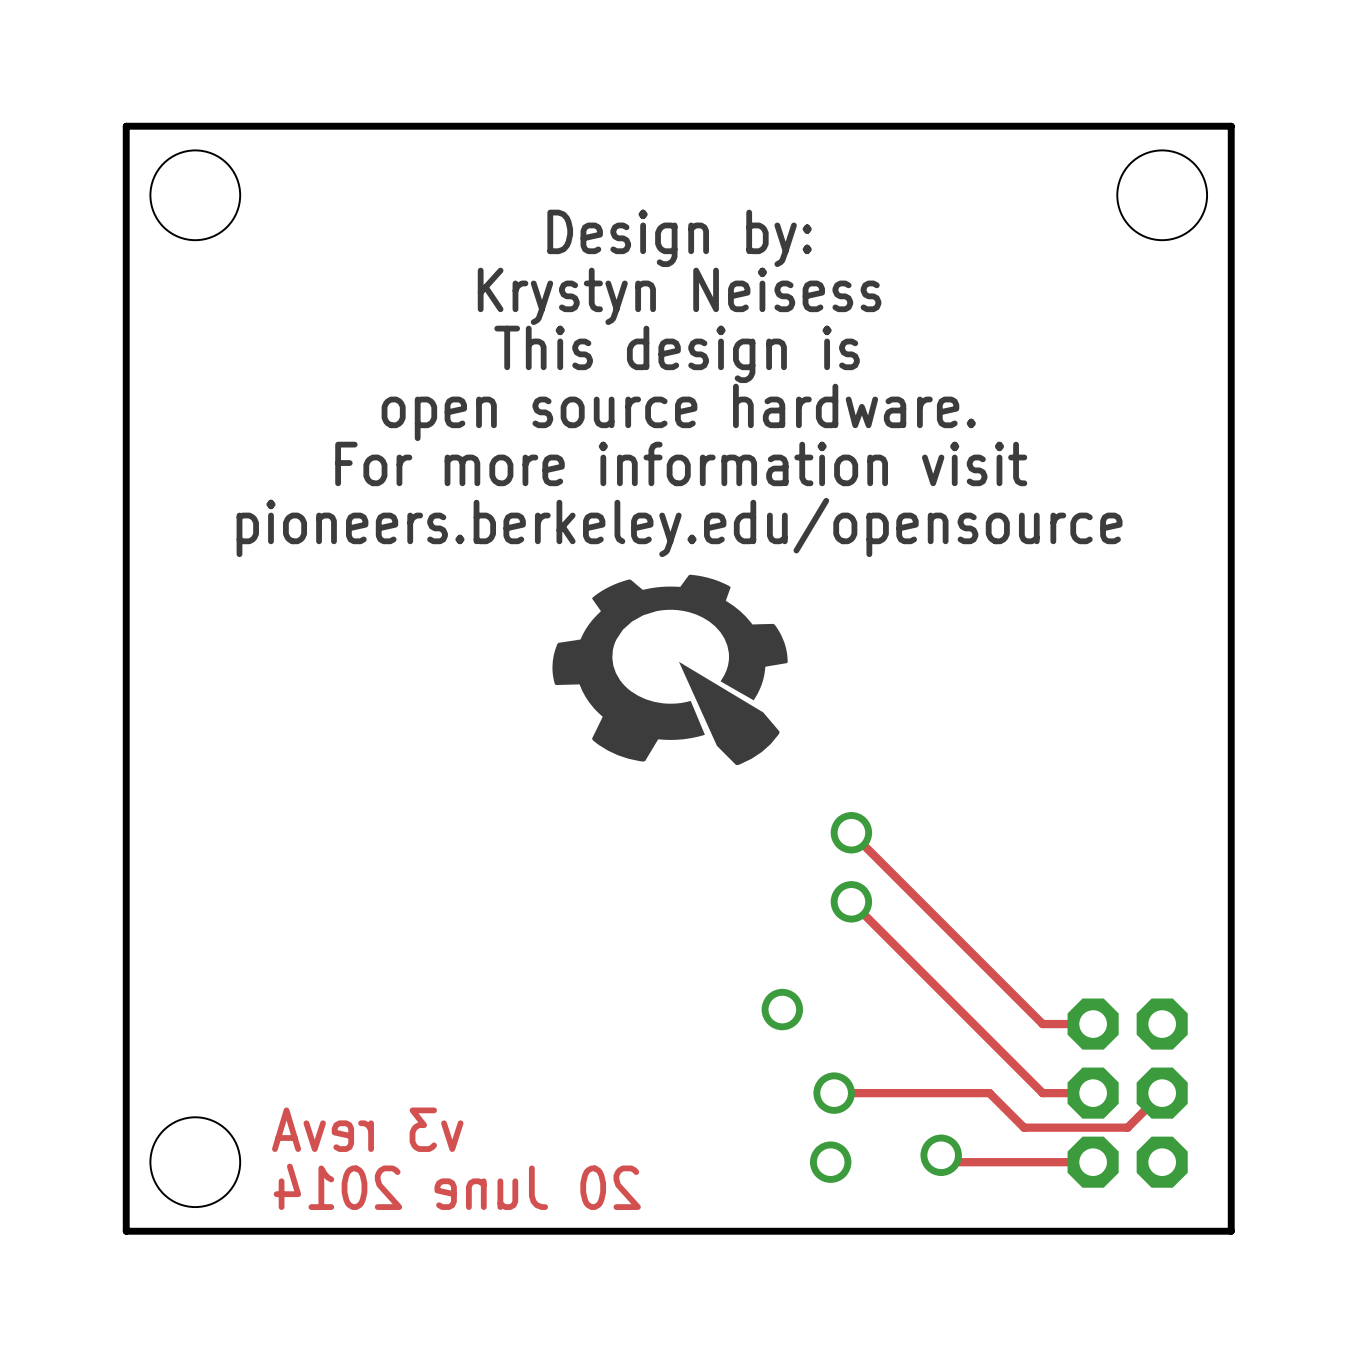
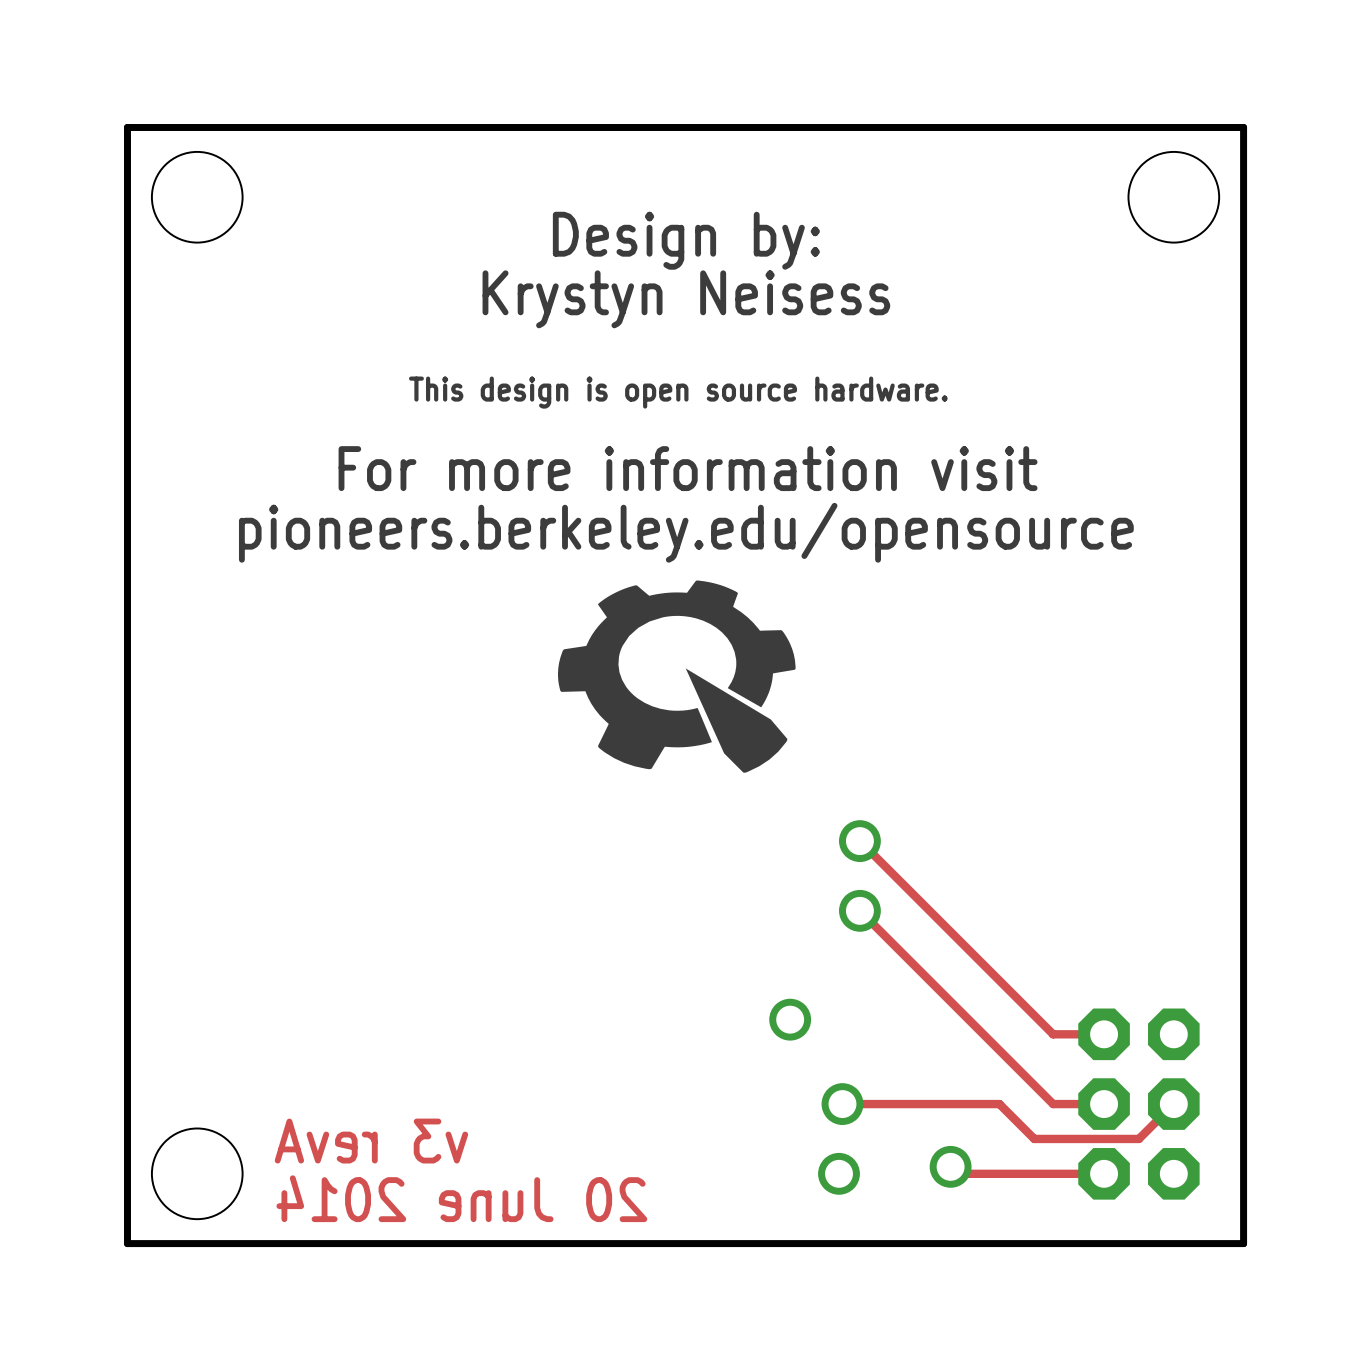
text: This design is (677, 354) -> none
text: open source hardware. (678, 412) -> This design is open source hardware. (678, 392)

